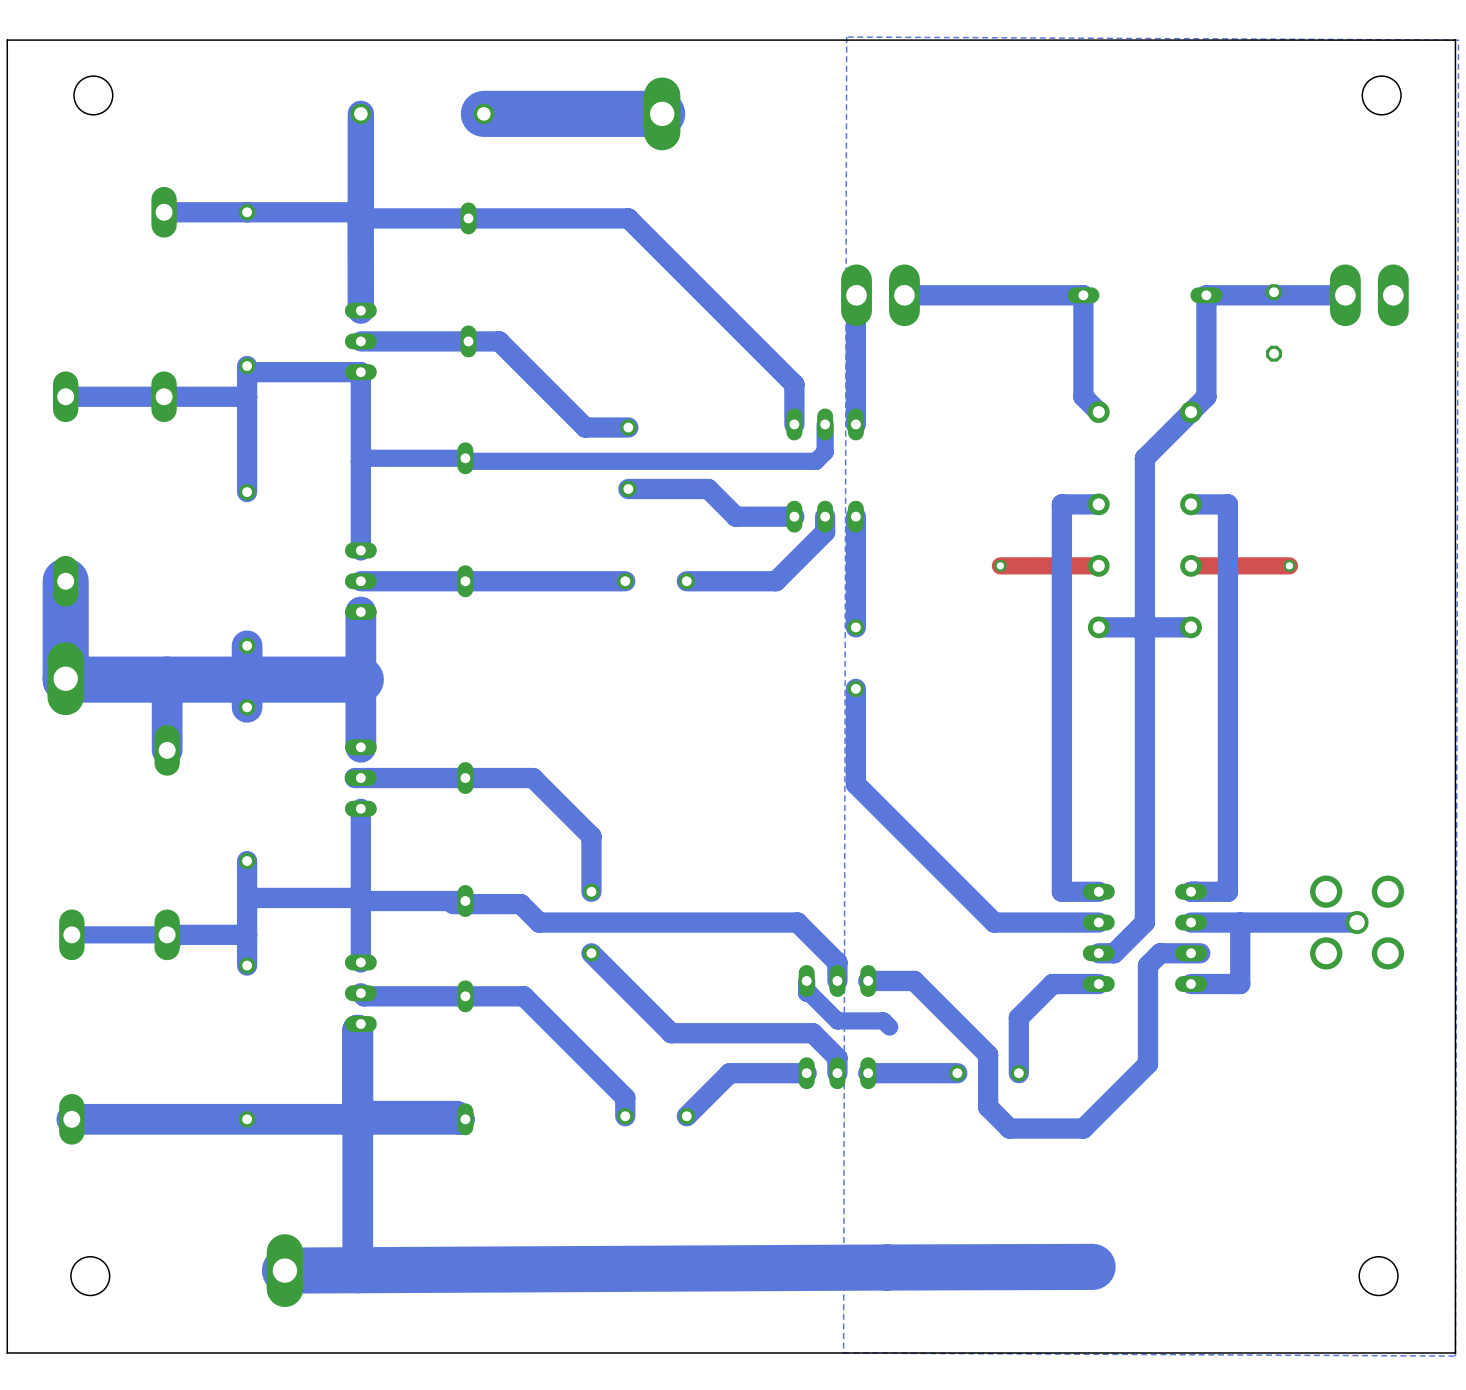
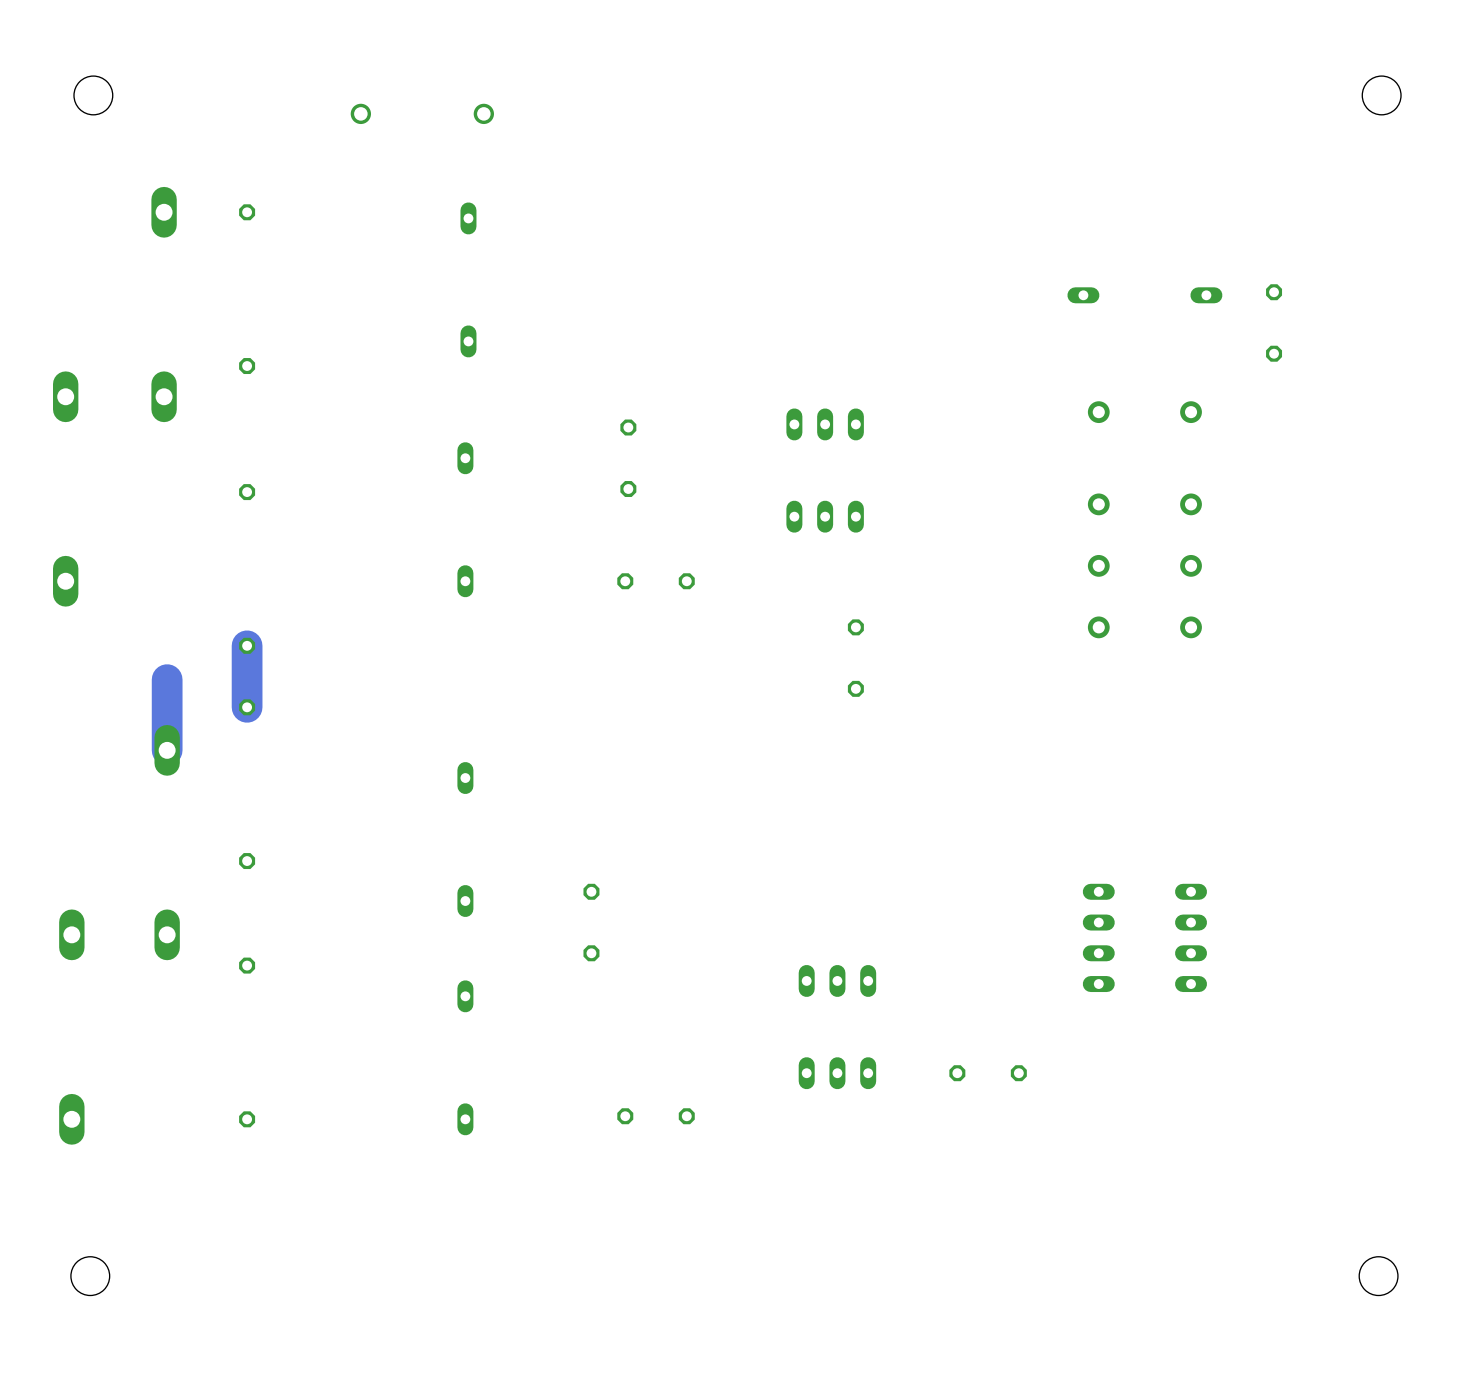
bottom zone outline: (846, 37) (1458, 40) (1455, 1356) (843, 1352) (846, 37) -> none
board edge: (1455, 40) (7, 40) (7, 1352) (1455, 1352) (1455, 40) -> none
bottom track: (360, 113) (360, 212) -> none
bottom track: (662, 113) (483, 113) -> none
part: (662, 113) -> none
bottom track: (360, 212) (363, 307) (360, 310) (360, 215) -> none
bottom track: (360, 212) (164, 212) -> none
bottom track: (360, 215) (363, 218) (628, 218) (794, 384) (794, 424) -> none
bottom track: (856, 295) (855, 424) -> none
part: (880, 295) -> none
bottom track: (904, 295) (1083, 295) (1083, 396) (1098, 412) -> none
bottom track: (1345, 295) (1206, 295) (1206, 396) (1144, 458) (1144, 922) (1114, 953) (1098, 953) -> none
part: (1369, 295) -> none
bottom track: (360, 341) (499, 341) (585, 427) (628, 427) -> none
part: (360, 341) -> none
bottom track: (247, 366) (247, 492) -> none
bottom track: (247, 372) (360, 372) (360, 550) -> none
bottom track: (247, 396) (65, 396) -> none
bottom track: (825, 424) (825, 452) (815, 461) (468, 461) (465, 458) (363, 458) (360, 461) -> none
bottom track: (628, 489) (708, 489) (735, 516) (794, 516) -> none
bottom track: (1098, 504) (1061, 504) (1061, 891) (1098, 891) -> none
bottom track: (1191, 504) (1227, 504) (1227, 891) (1191, 891) -> none
bottom track: (825, 516) (825, 532) (775, 581) (686, 581) -> none
bottom track: (855, 516) (855, 627) -> none
via: (1000, 565) -> none
top track: (1098, 565) (1000, 565) -> none
top track: (1289, 565) (1191, 565) -> none
via: (1289, 565) -> none
bottom track: (65, 581) (65, 679) (360, 679) -> none
part: (360, 581) -> none
bottom track: (625, 581) (360, 581) -> none
bottom track: (360, 611) (360, 747) -> none
bottom track: (1191, 627) (1098, 627) -> none
part: (65, 678) -> none
bottom track: (855, 688) (855, 784) (994, 922) (1098, 922) -> none
bottom track: (354, 778) (533, 778) (591, 836) (591, 891) -> none
part: (360, 778) -> none
bottom track: (360, 808) (360, 962) -> none
bottom track: (247, 861) (247, 965) -> none
bottom track: (465, 901) (360, 901) (363, 897) (250, 897) (247, 901) -> none
bottom track: (453, 904) (520, 904) (539, 922) (797, 922) (837, 962) (837, 980) -> none
bottom track: (1240, 922) (1240, 984) (1191, 984) -> none
bottom track: (1357, 922) (1191, 922) -> none
part: (1357, 922) -> none
bottom track: (71, 934) (173, 934) (173, 940) -> none
bottom track: (247, 934) (167, 934) -> none
bottom track: (591, 953) (671, 1033) (812, 1033) (837, 1057) (837, 1073) -> none
bottom track: (1200, 953) (1160, 953) (1147, 965) (1147, 1063) (1083, 1128) (1009, 1128) (988, 1107) (988, 1054) (914, 980) (868, 980) -> none
bottom track: (806, 980) (806, 993) (809, 993) (837, 1020) (883, 1020) (889, 1027) -> none
bottom track: (1098, 984) (1052, 984) (1018, 1017) (1018, 1073) -> none
bottom track: (360, 993) (363, 996) (523, 996) (625, 1097) (625, 1116) -> none
part: (360, 993) -> none
bottom track: (357, 1030) (357, 1270) -> none
bottom track: (806, 1073) (729, 1073) (686, 1116) -> none
bottom track: (957, 1073) (868, 1073) -> none
bottom track: (357, 1116) (456, 1116) (459, 1119) (71, 1119) -> none
bottom track: (1092, 1266) (284, 1270) -> none
part: (284, 1270) -> none

